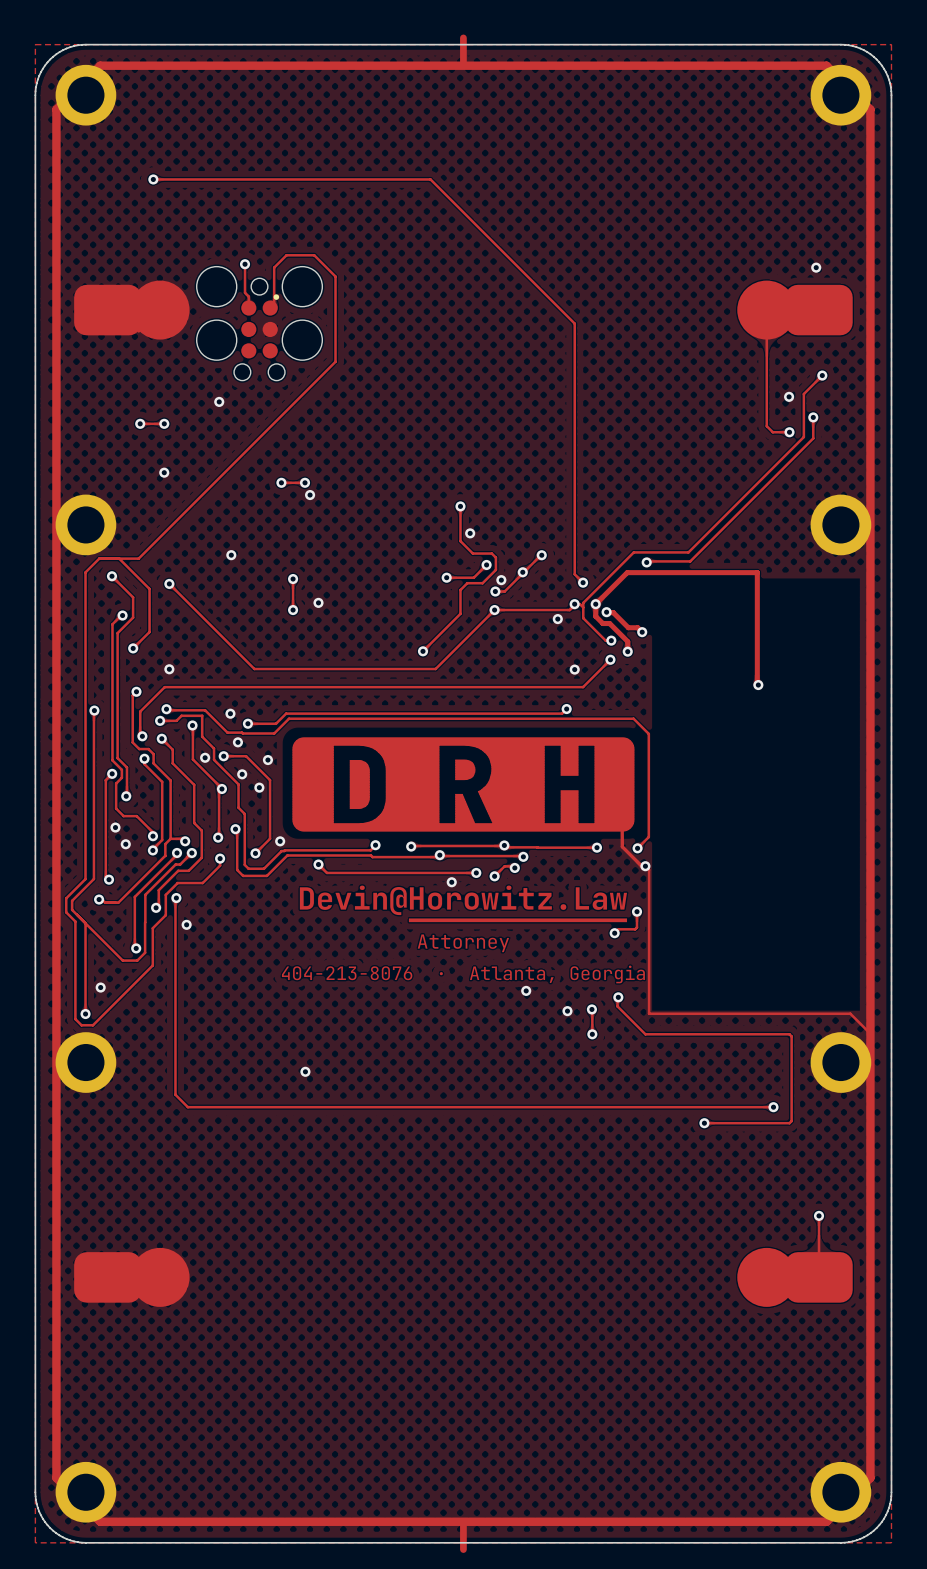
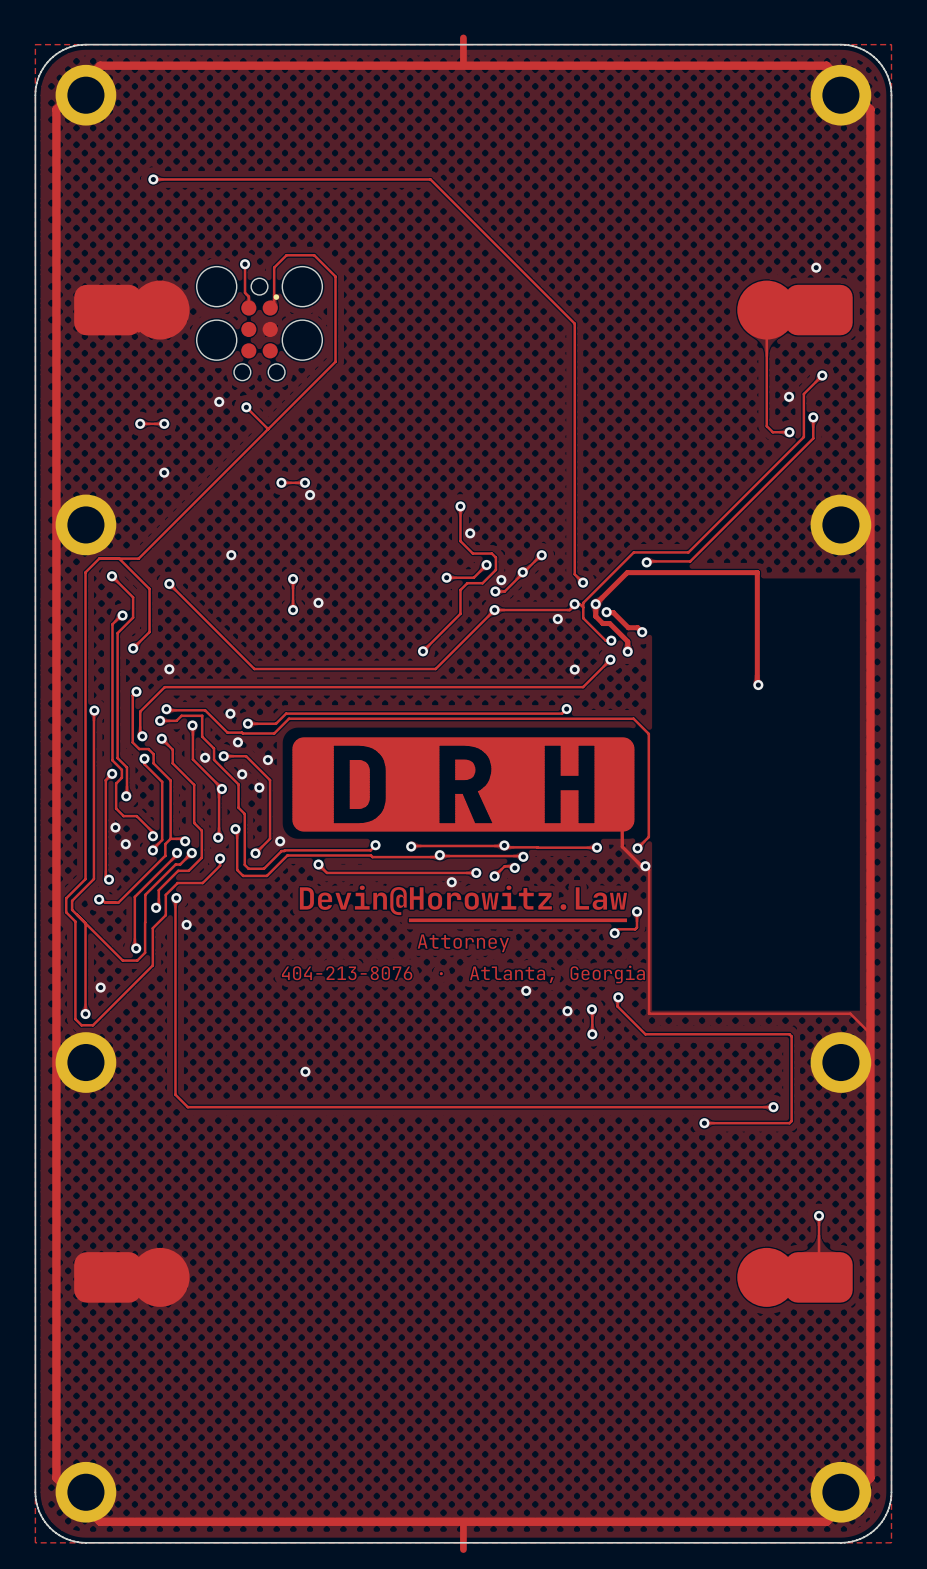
track: none -> (246, 407) (268, 429)
via: none -> (246, 407)

